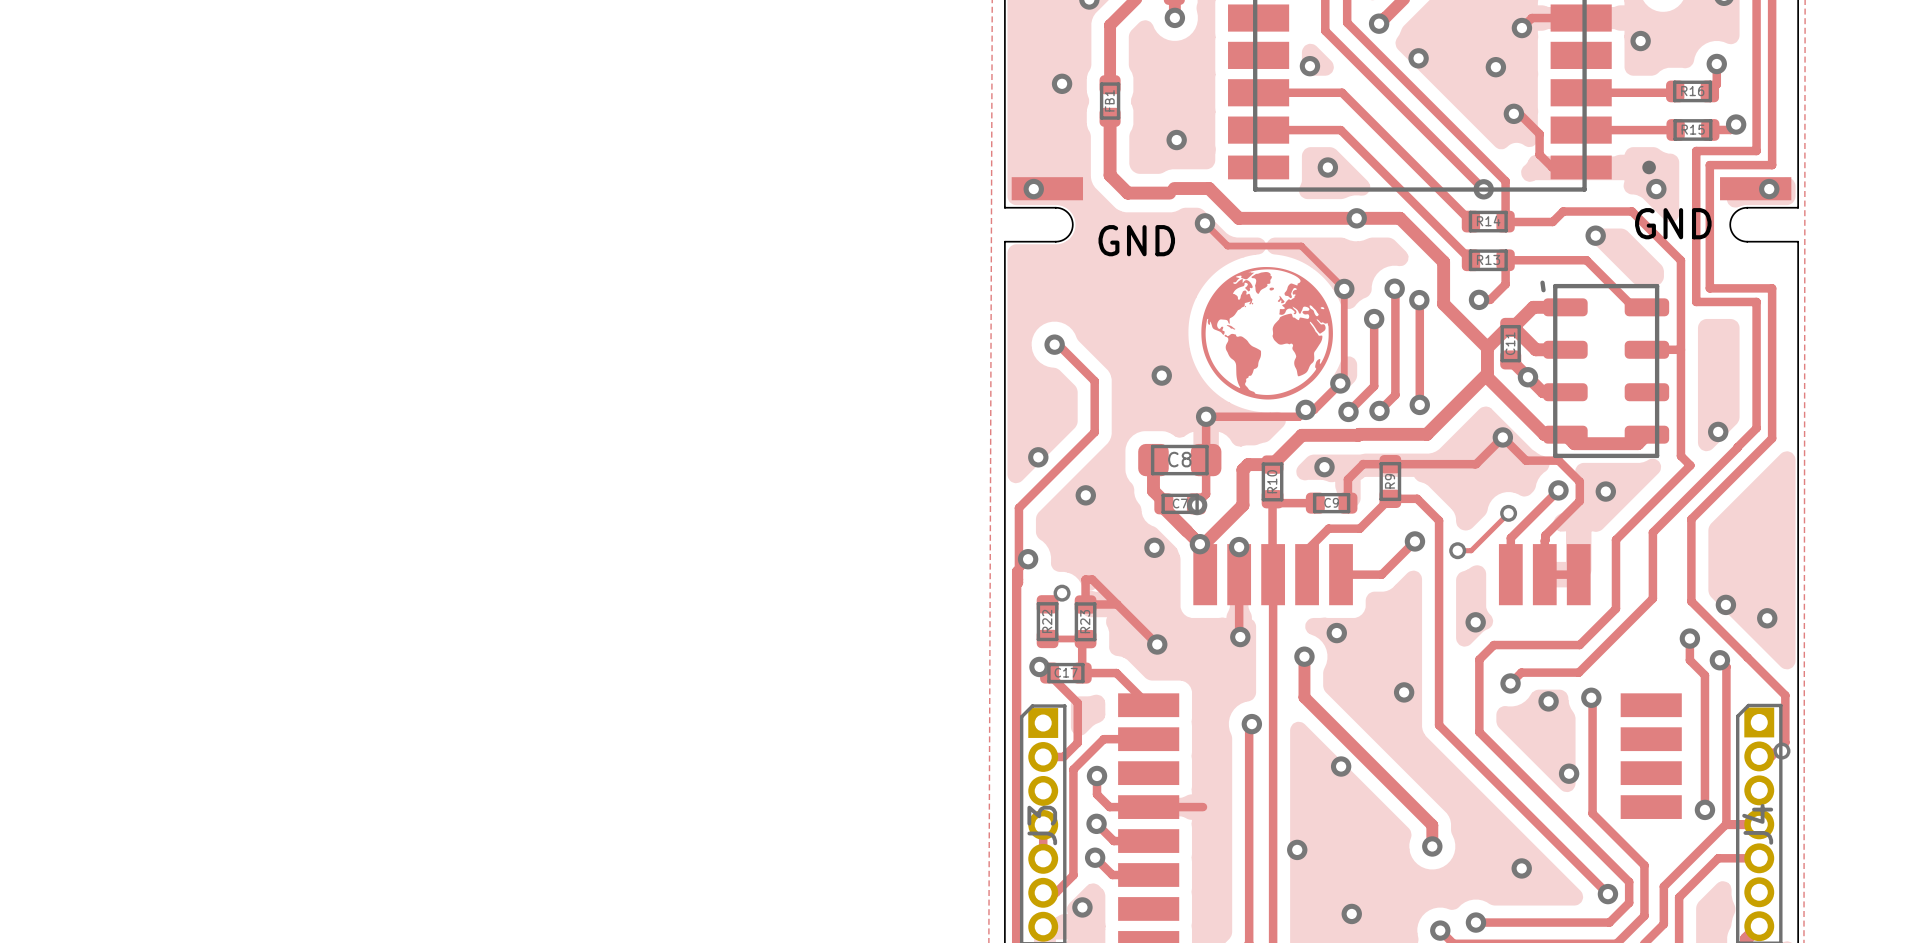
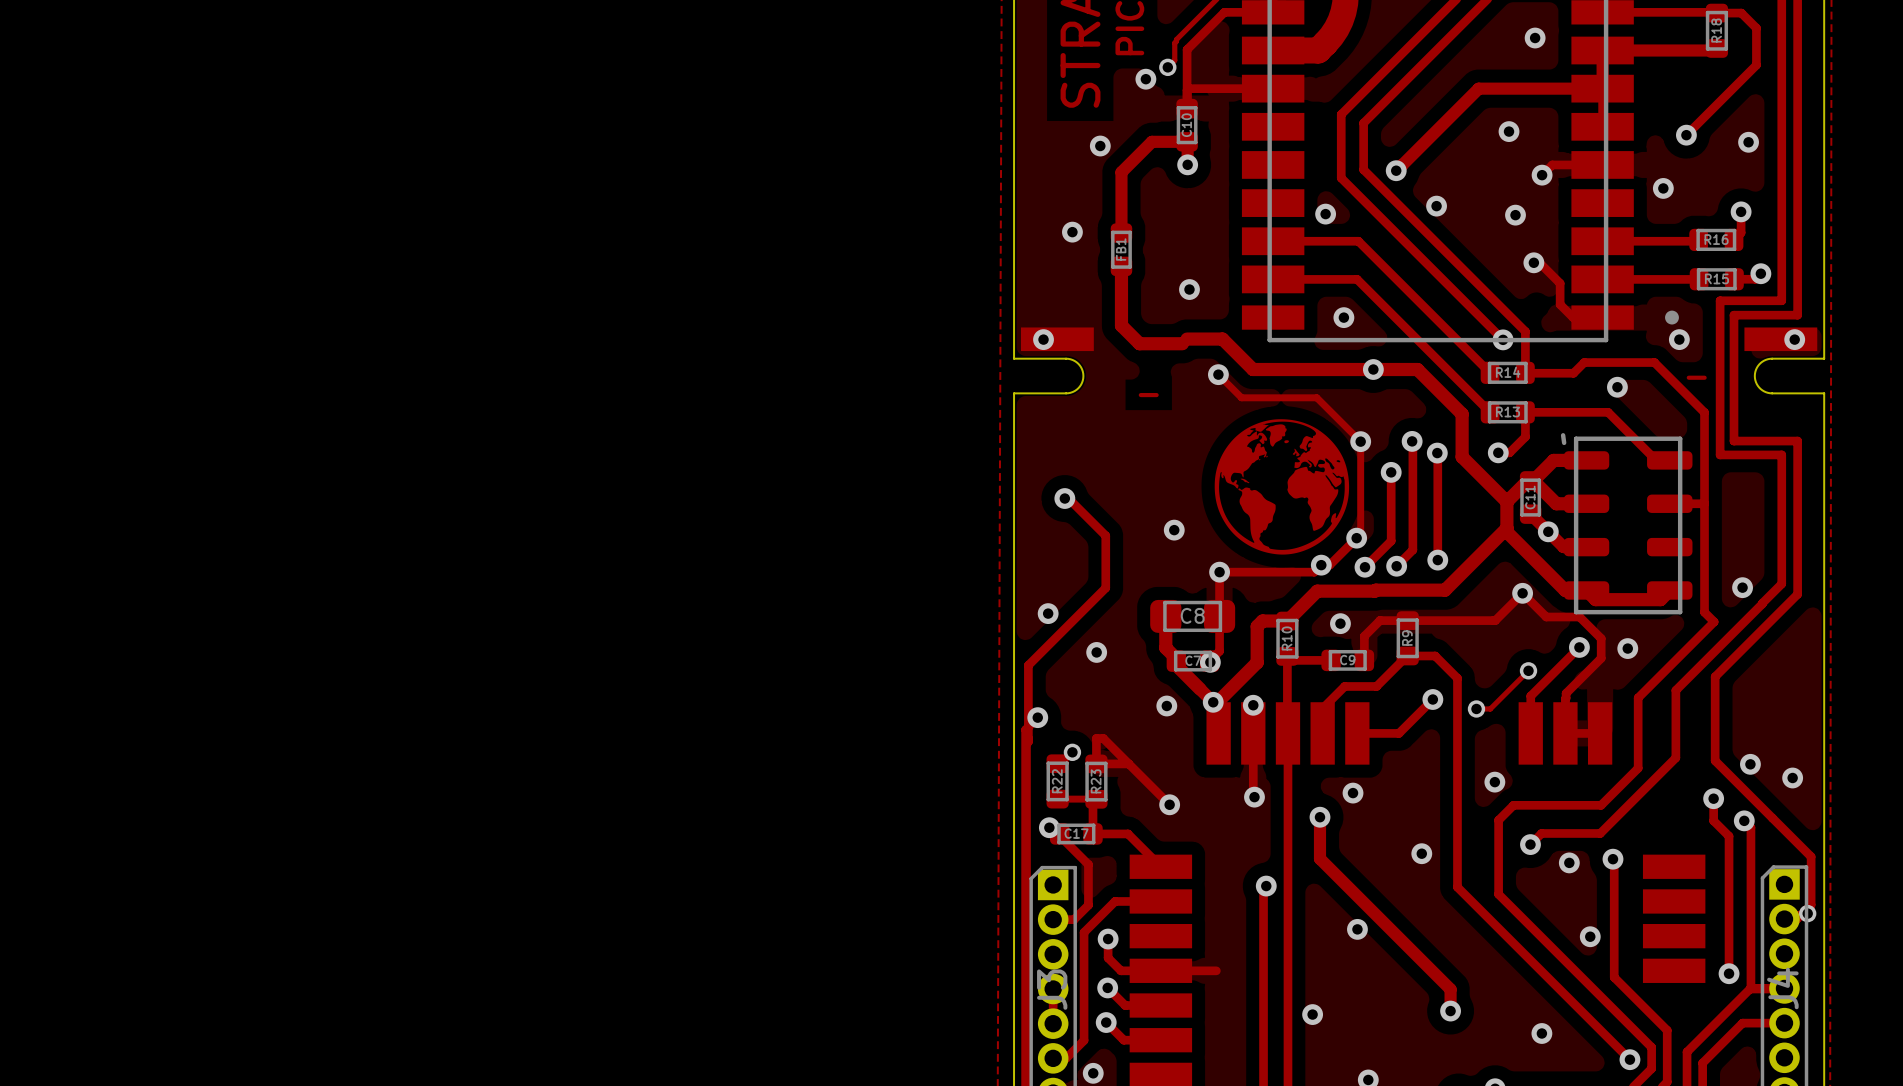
text: GND (1673, 223) -> - (1696, 377)
text: GND (1136, 240) -> - (1148, 395)

